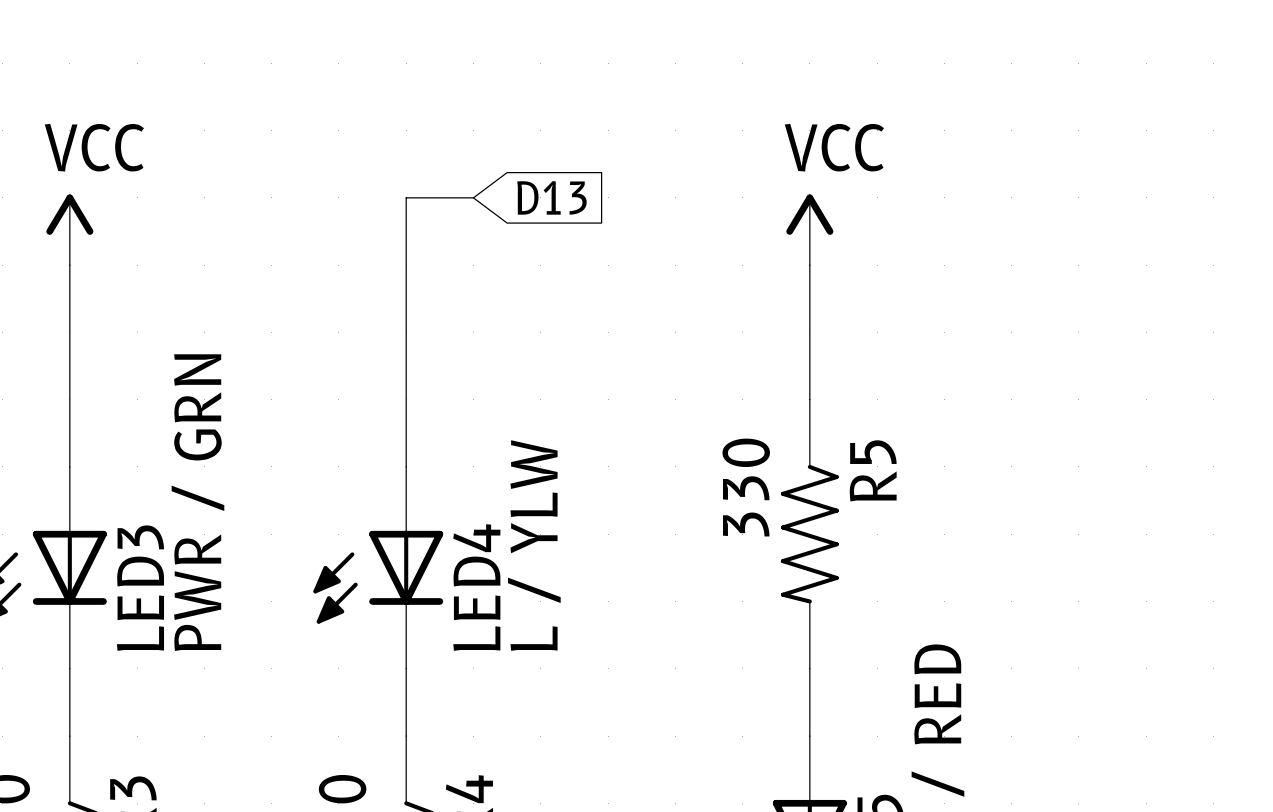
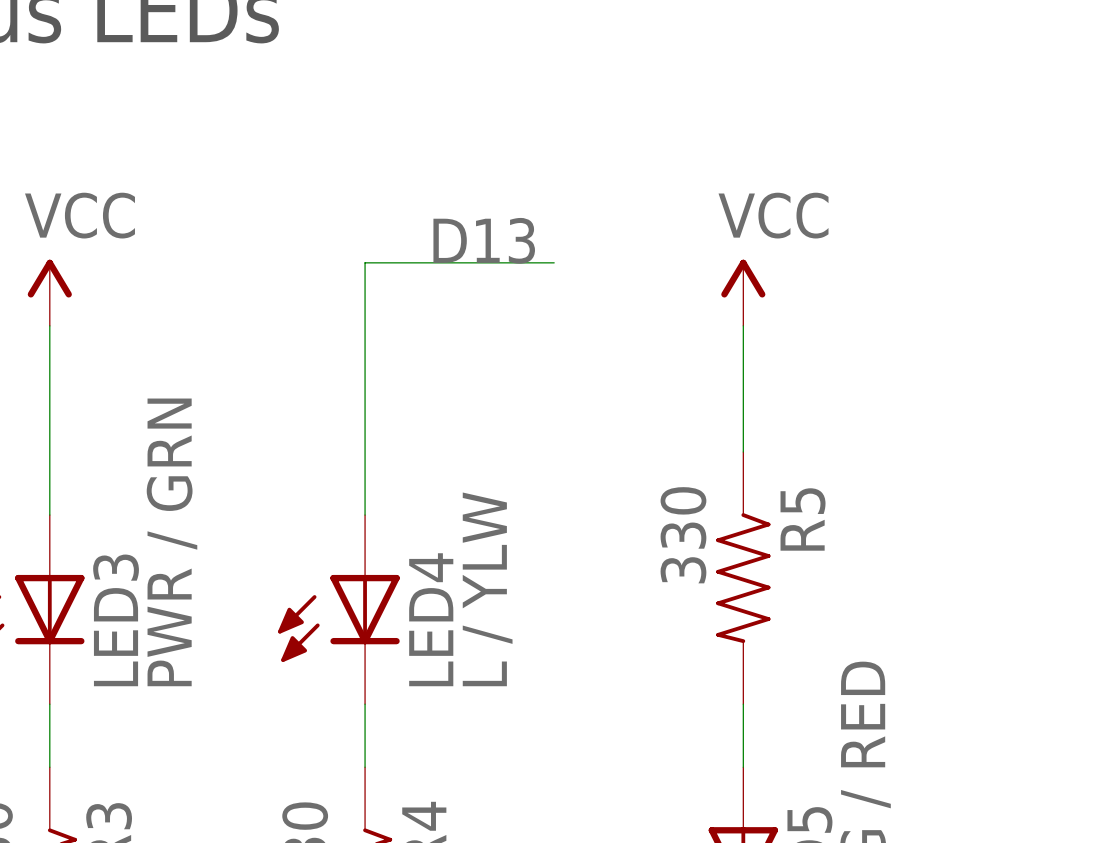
label: none -> D13 (484, 240)
wire: none -> (428, 262) (554, 262)
global label: D13 (551, 197) -> none

